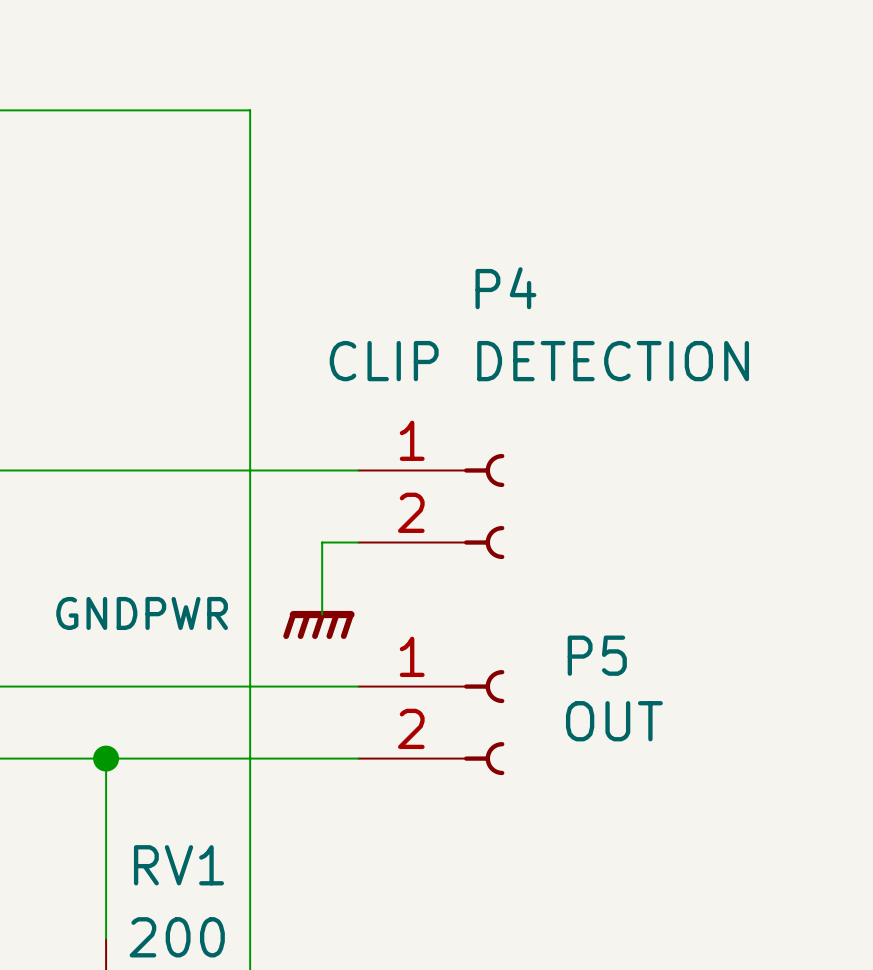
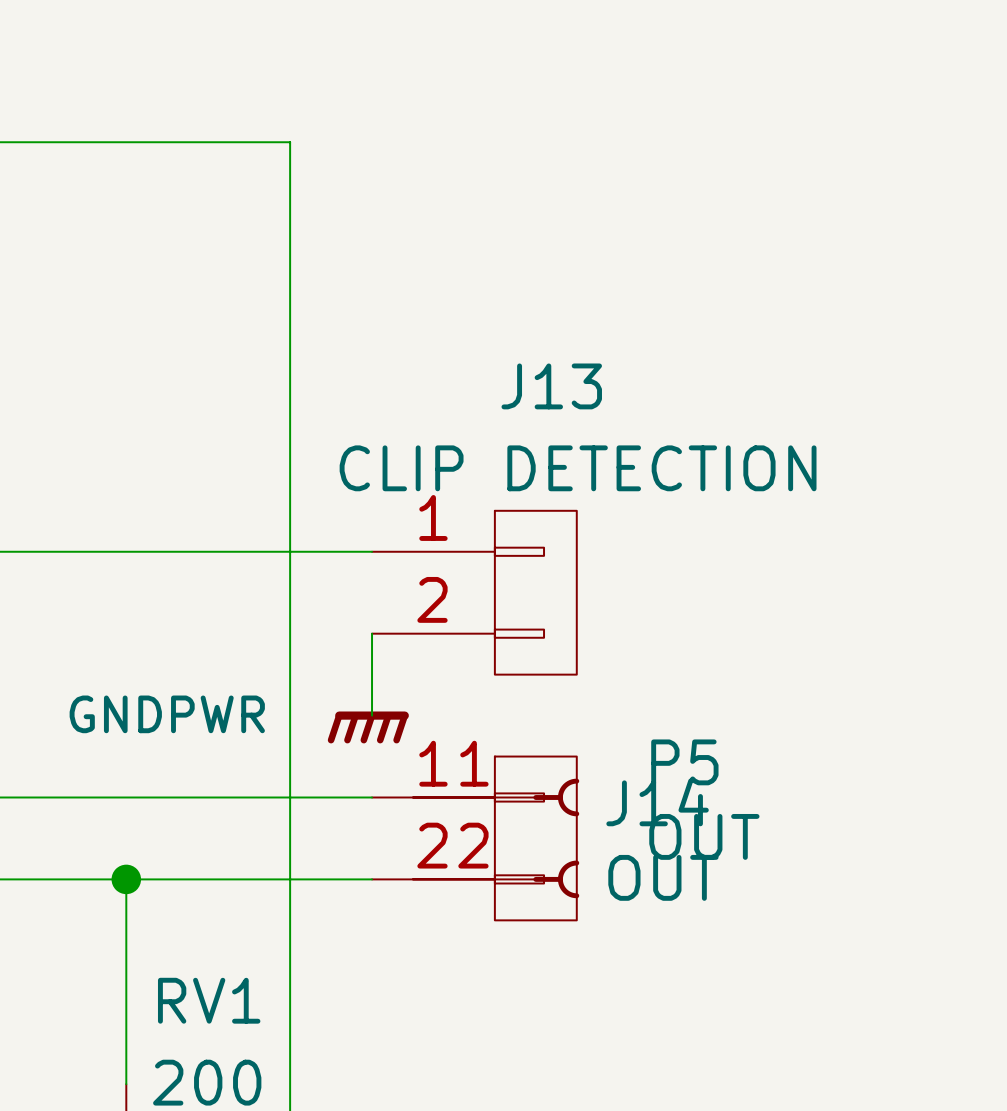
J13: none -> CLIP DETECTION (474, 592)
P4: CLIP DETECTION (431, 506) -> none
J14: none -> OUT (474, 838)

